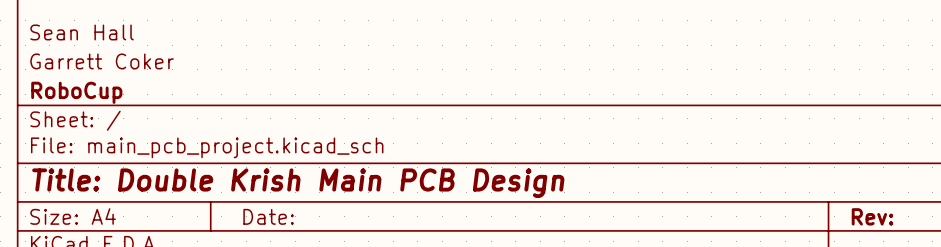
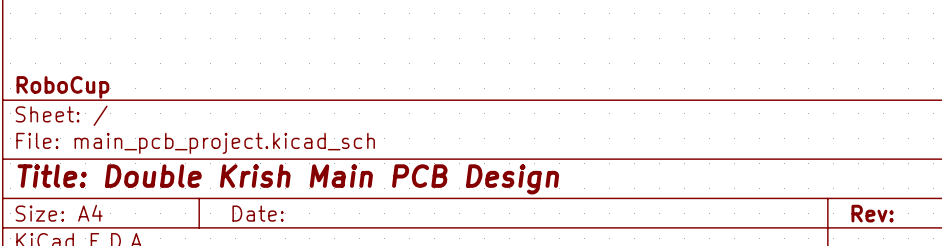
title block: Sean Hall (82, 32) -> none
title block: Garrett Coker (102, 61) -> none

